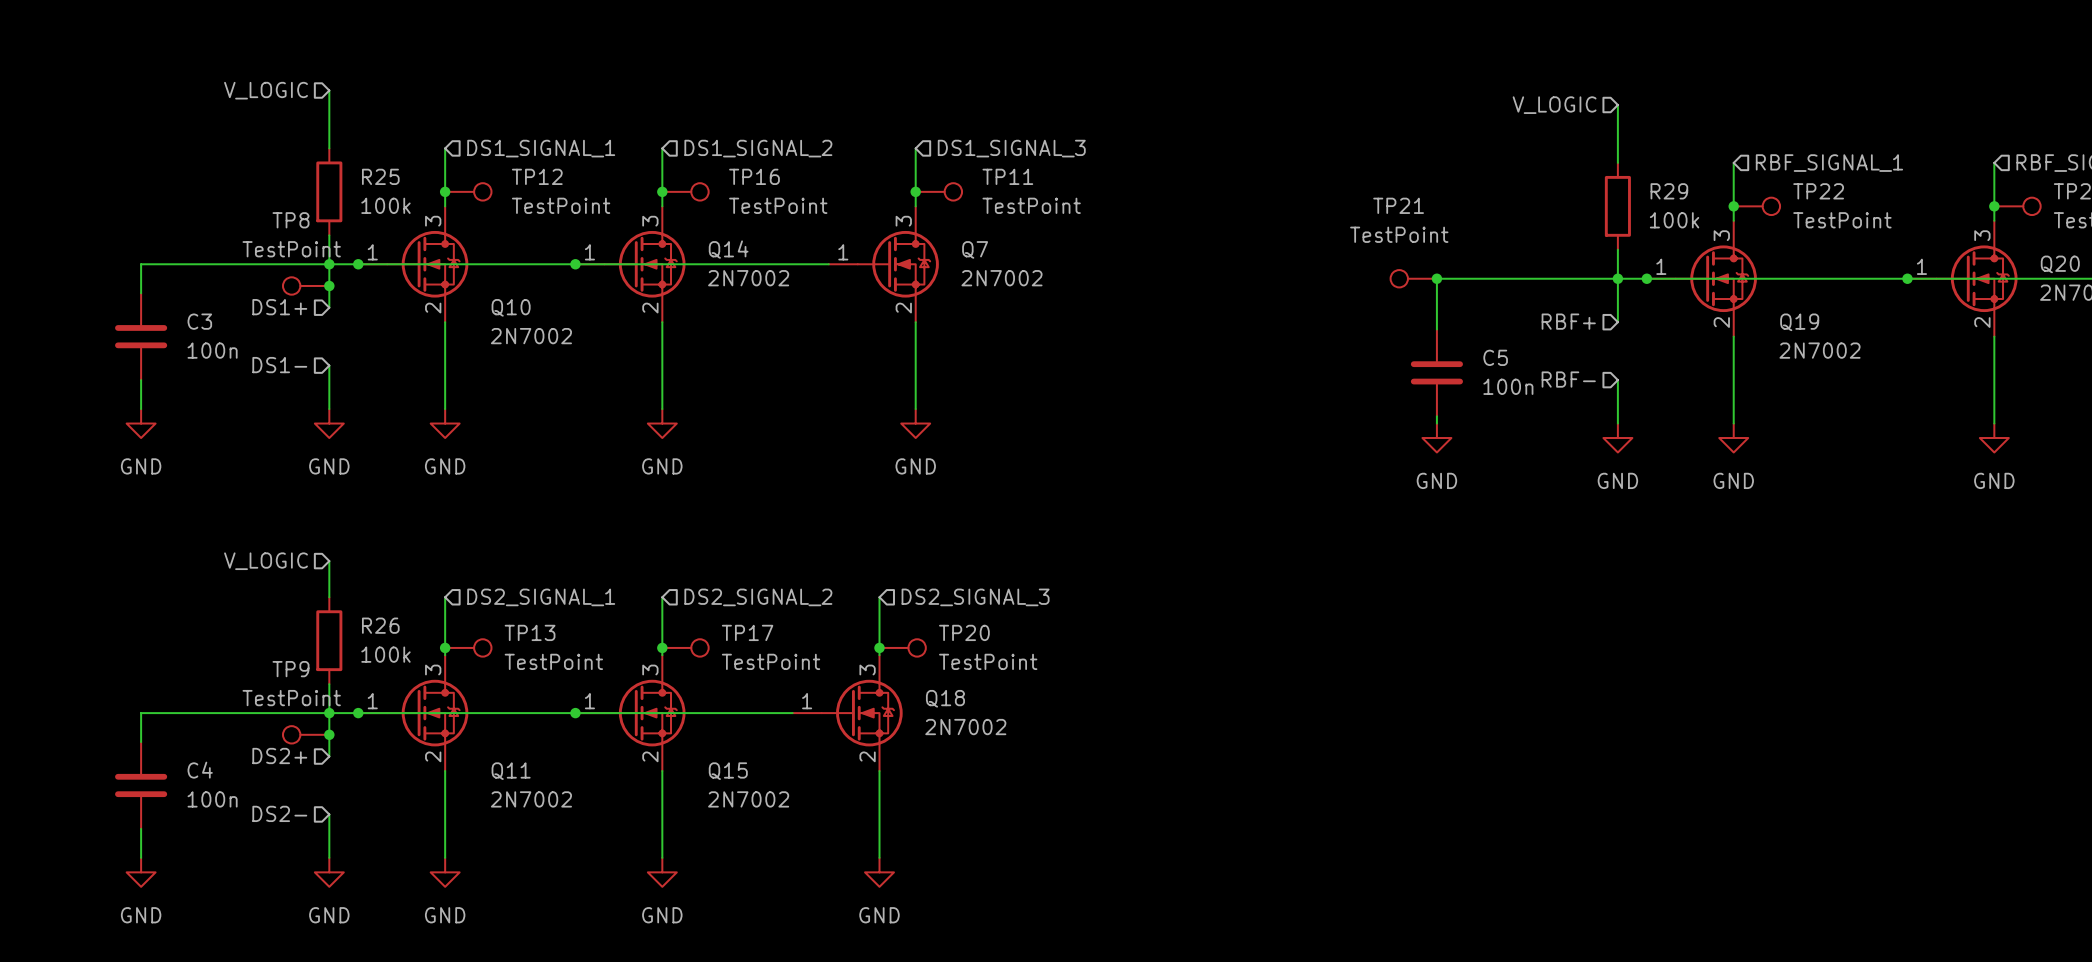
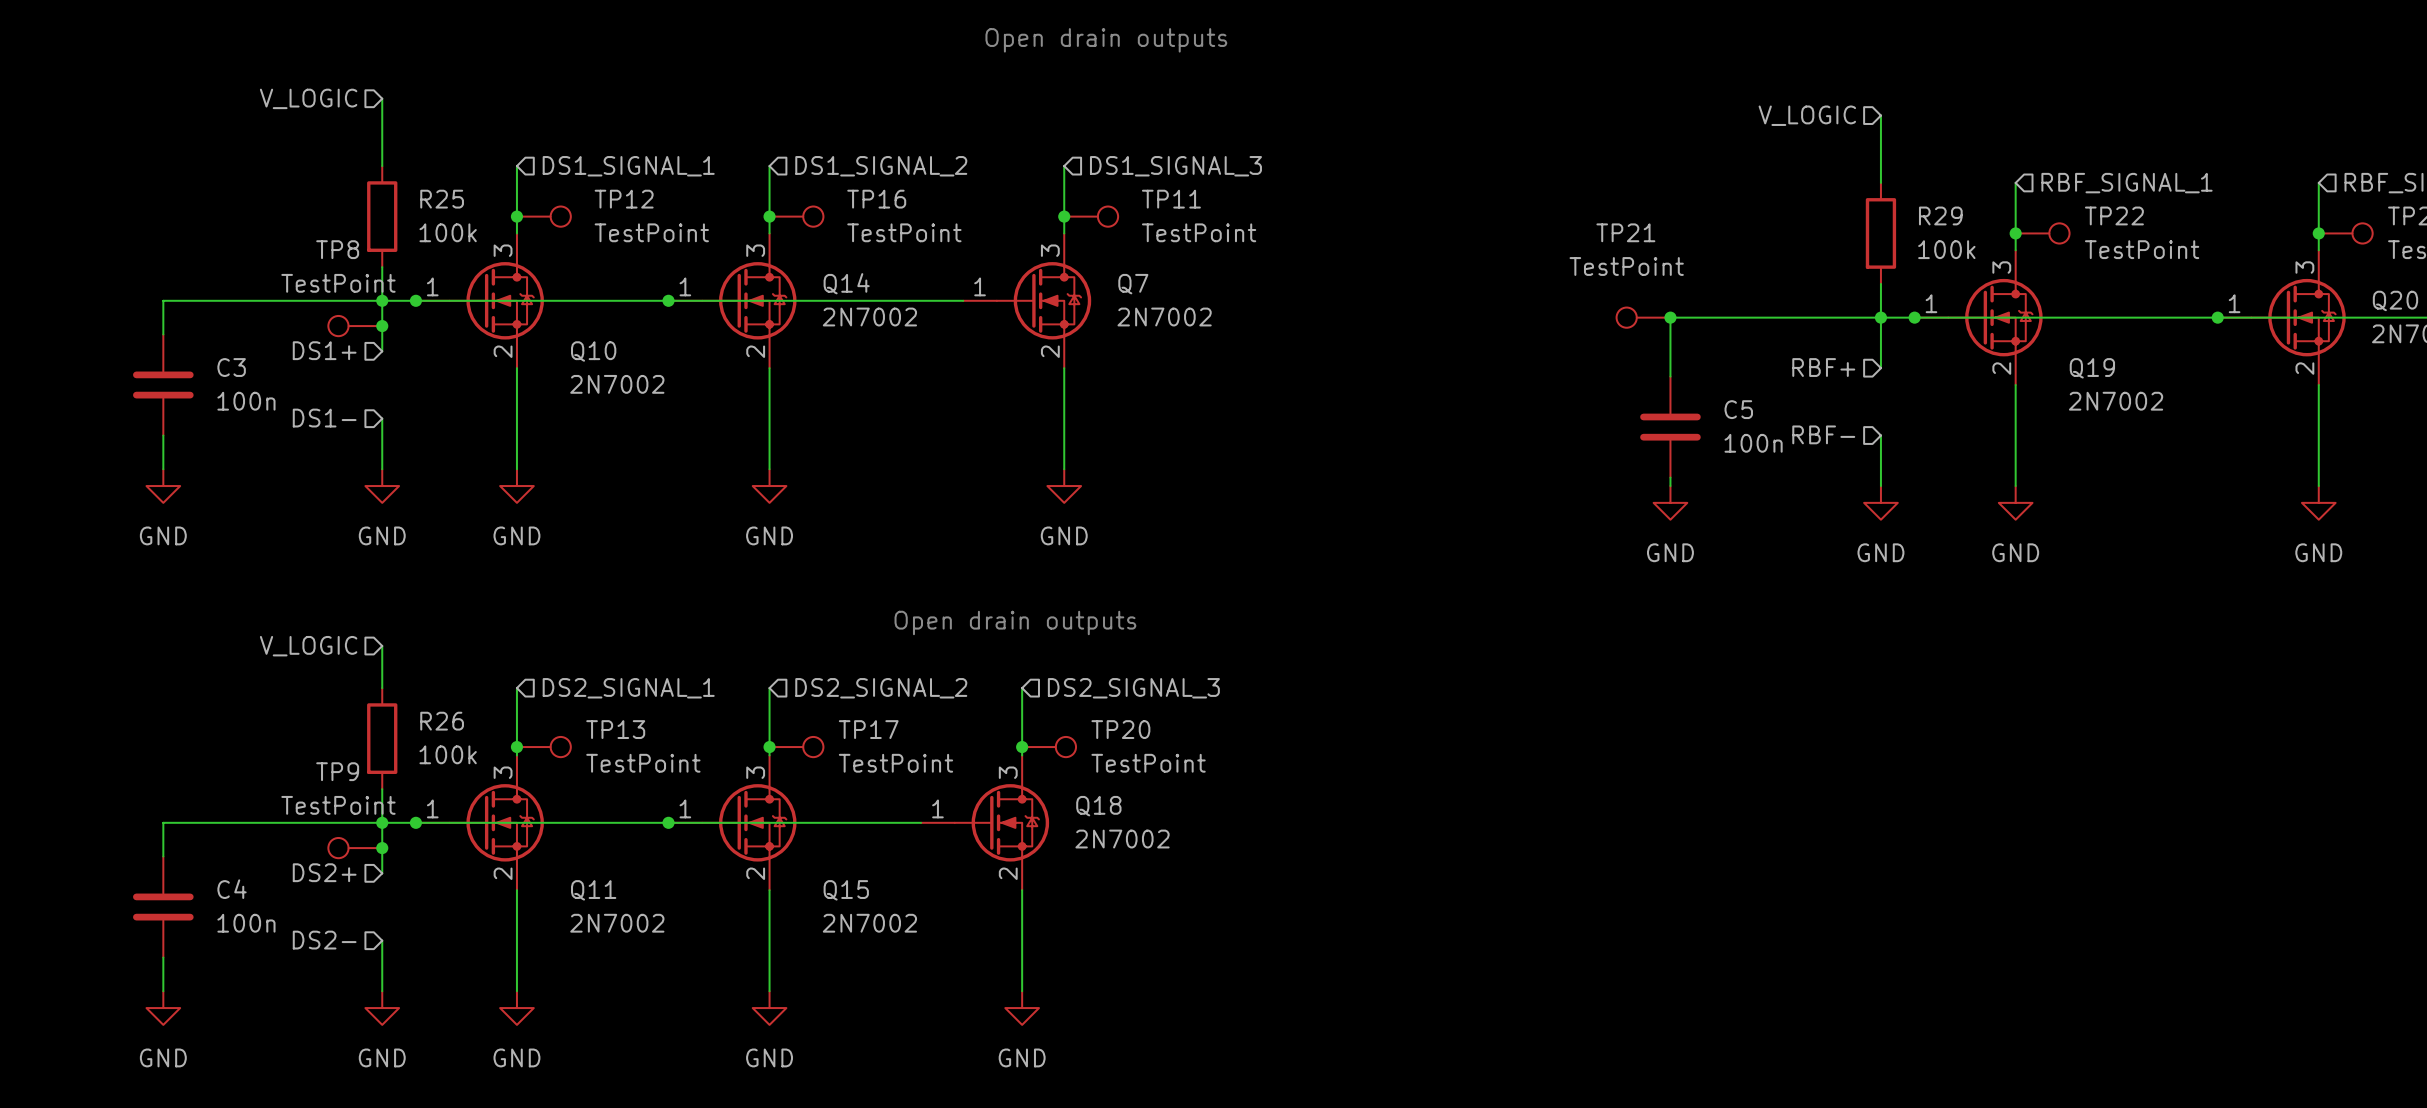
text: none -> Open drain outputs (1106, 40)
text: none -> Open drain outputs (1015, 622)

